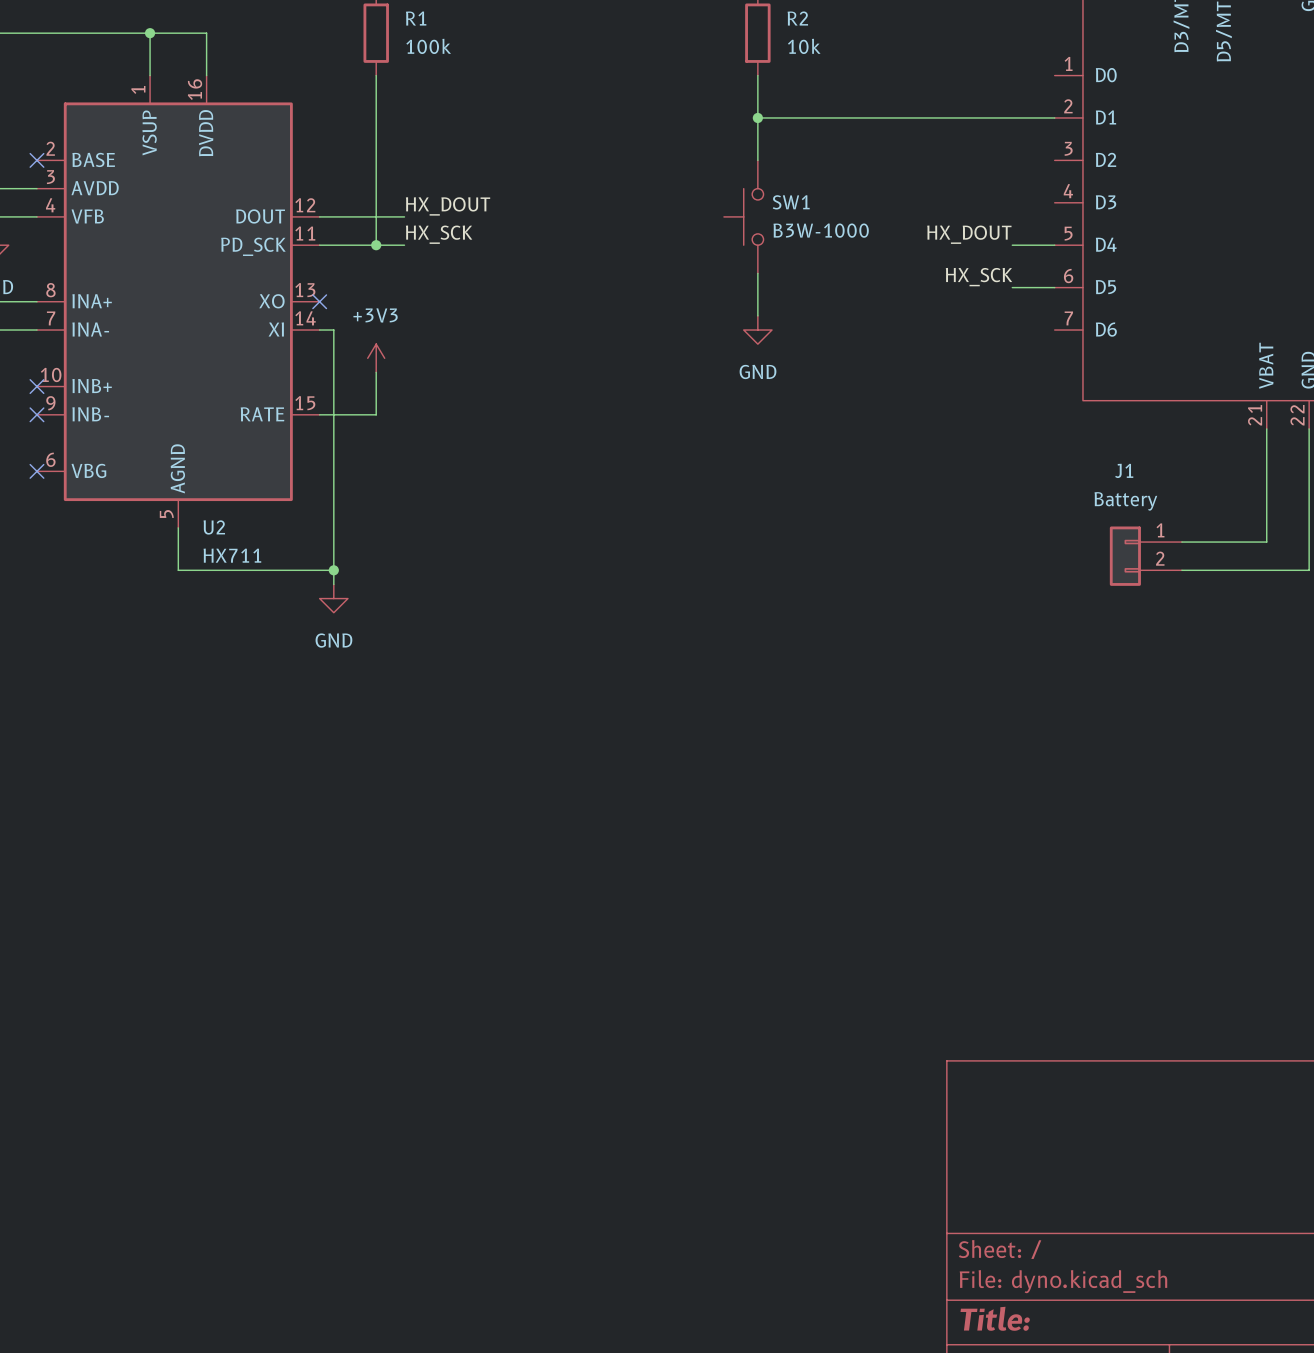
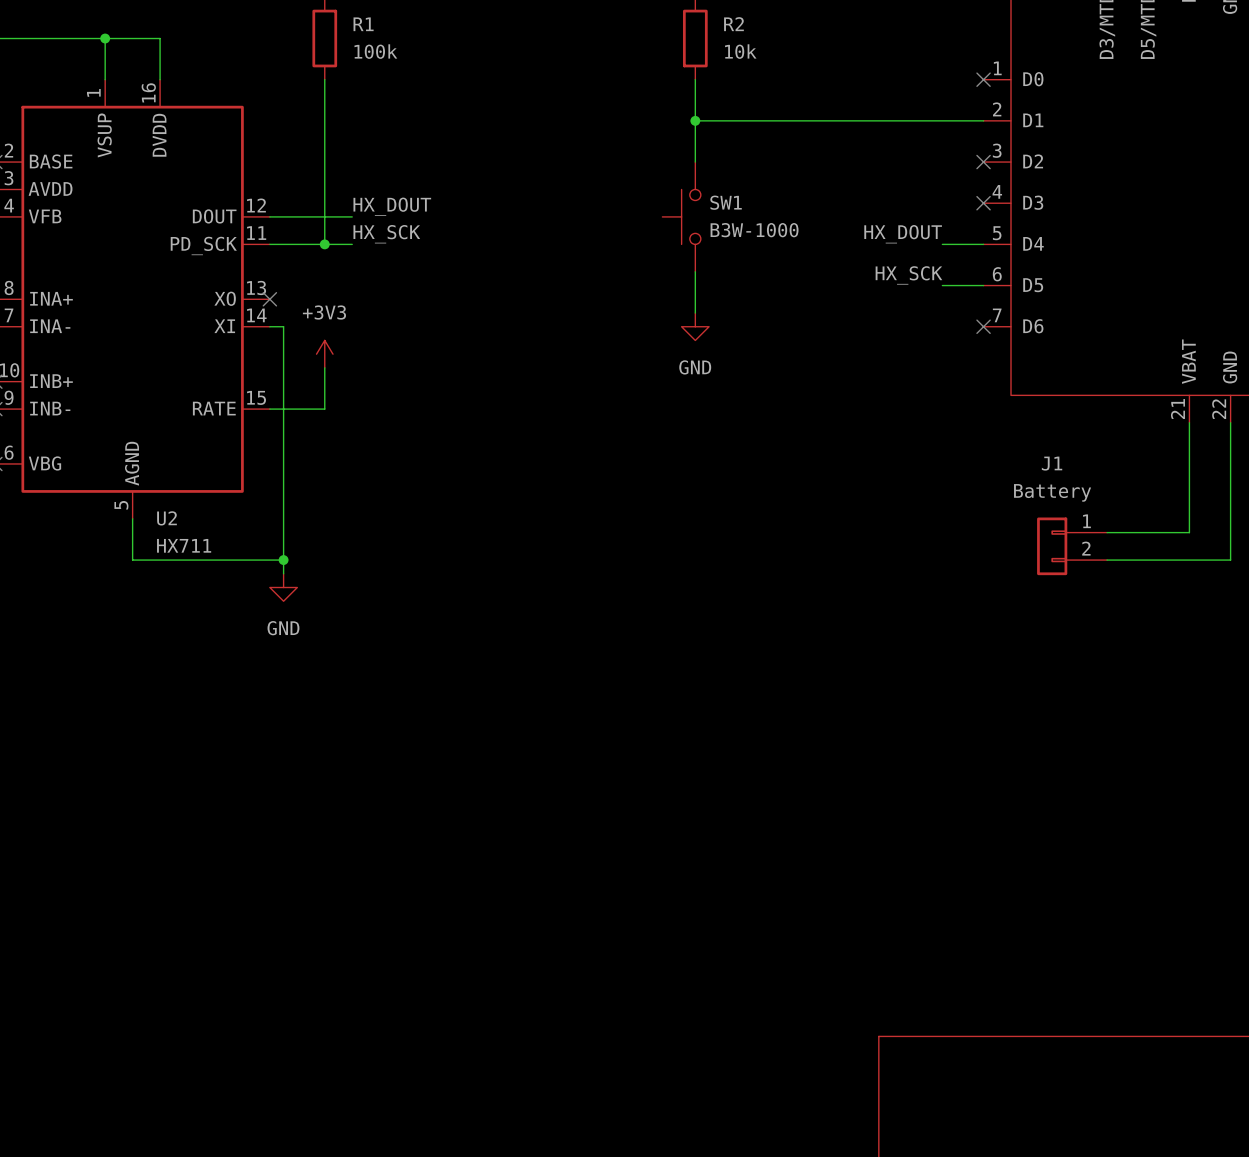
no-connect mark: none -> (983, 79)
no-connect mark: none -> (983, 162)
no-connect mark: none -> (983, 203)
no-connect mark: none -> (983, 326)

